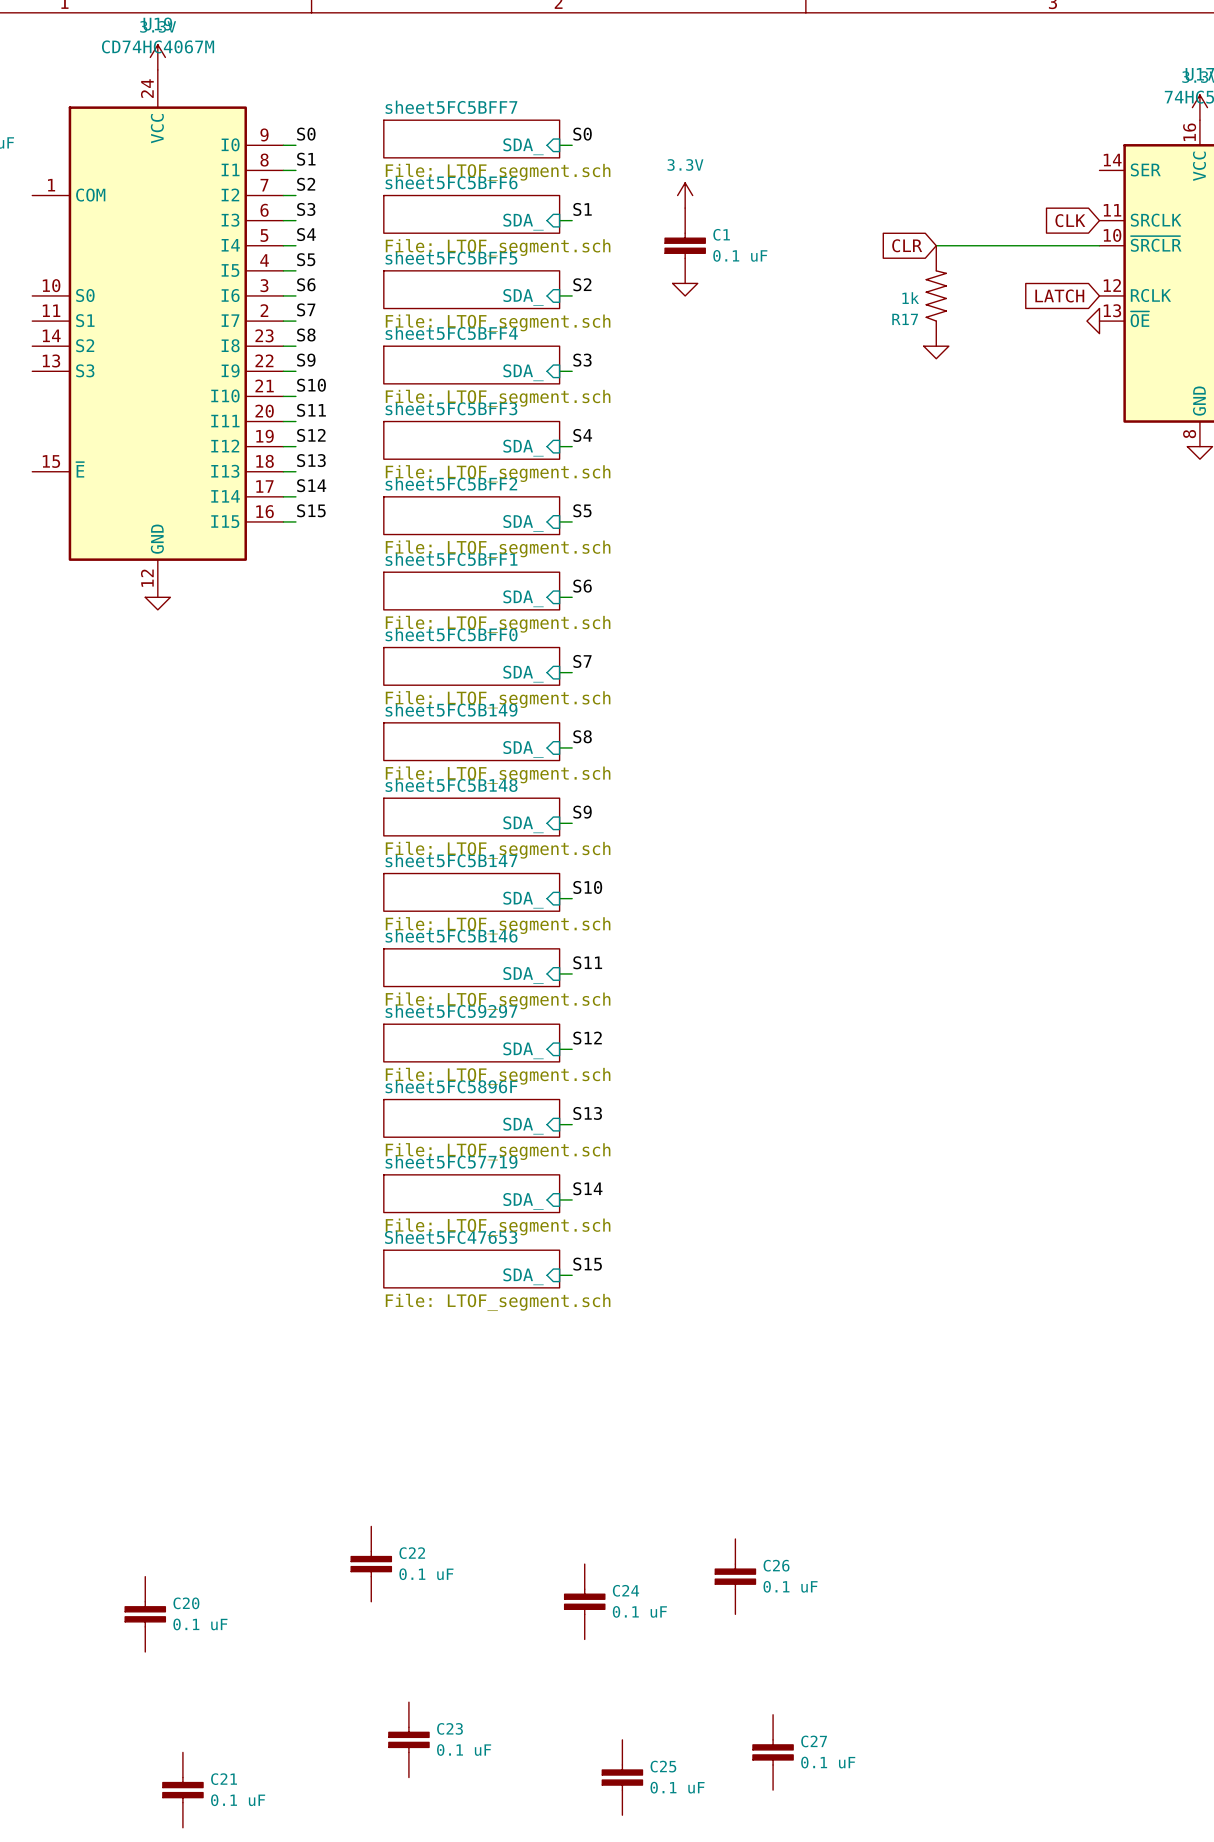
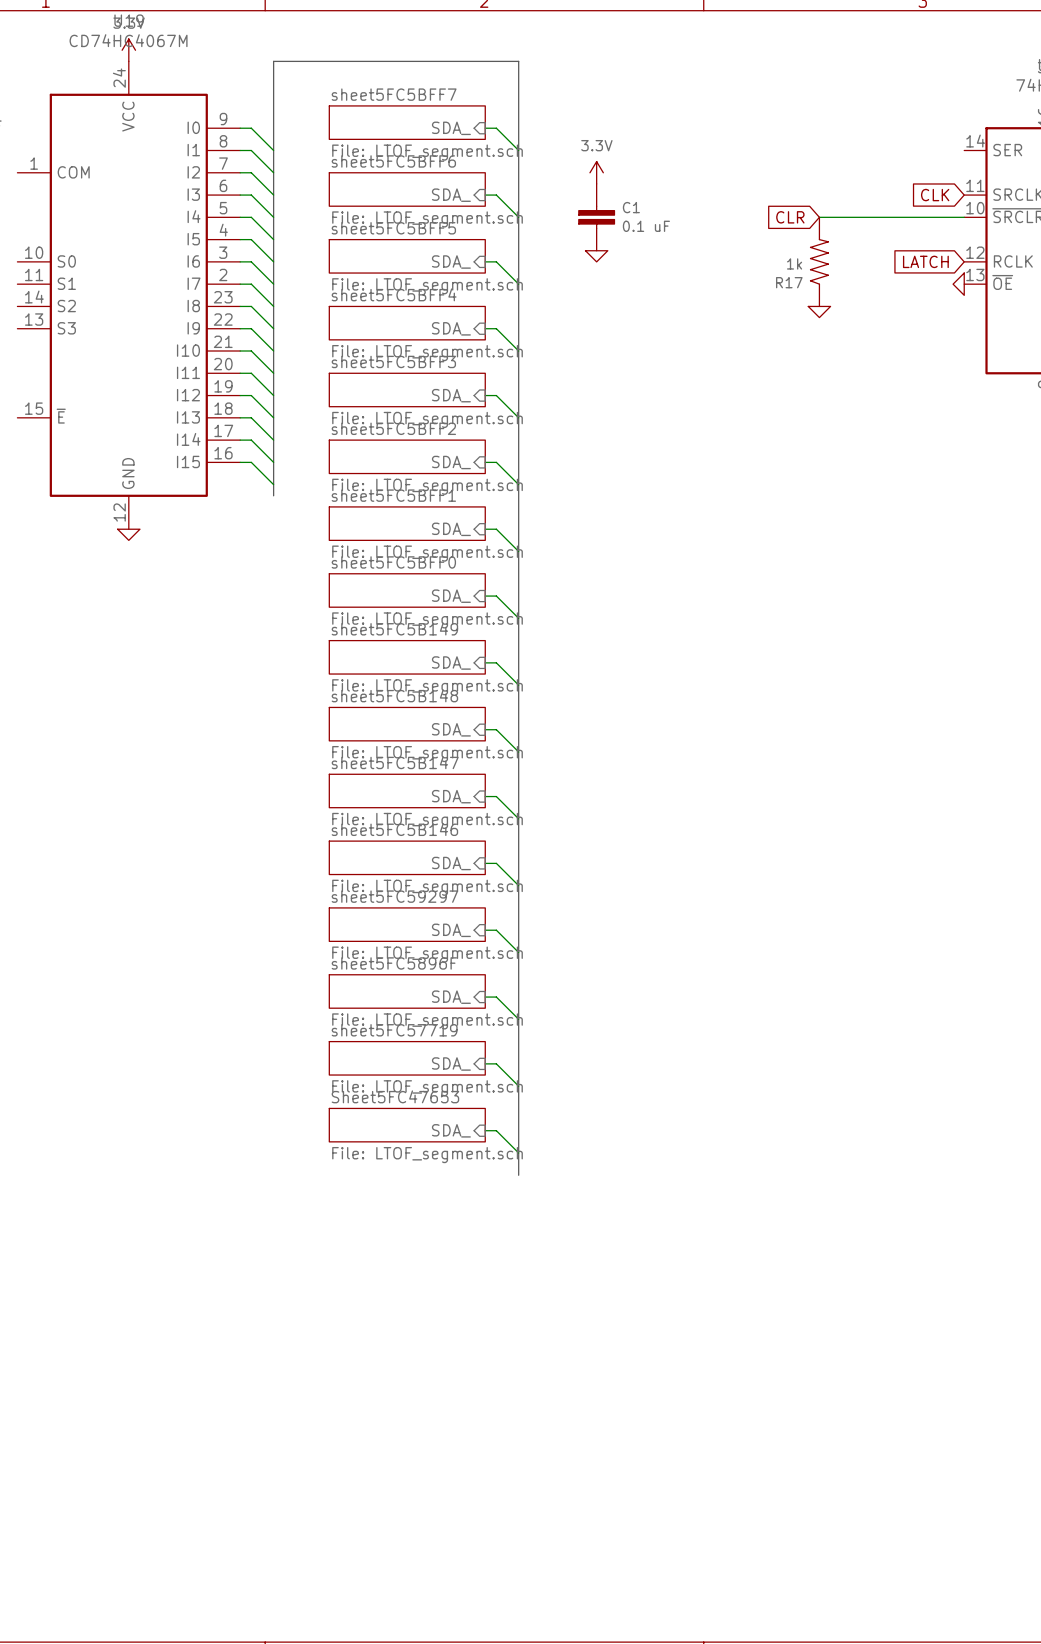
label: S0 (306, 134) -> none
label: S0 (582, 134) -> none
wire: none -> (251, 128) (273, 150)
wire: none -> (496, 128) (518, 150)
label: S1 (306, 159) -> none
wire: none -> (251, 150) (273, 172)
label: S2 (306, 184) -> none
wire: none -> (251, 172) (273, 195)
label: S3 (306, 209) -> none
label: S1 (582, 209) -> none
wire: none -> (251, 195) (273, 217)
wire: none -> (496, 195) (518, 217)
label: S4 (306, 234) -> none
wire: none -> (251, 217) (273, 239)
label: S5 (306, 259) -> none
wire: none -> (251, 239) (273, 261)
label: S6 (306, 284) -> none
label: S2 (582, 284) -> none
wire: none -> (251, 261) (273, 284)
wire: none -> (496, 261) (518, 284)
label: S7 (306, 309) -> none
wire: none -> (251, 284) (273, 306)
label: S8 (306, 335) -> none
wire: none -> (251, 306) (273, 328)
label: S9 (306, 360) -> none
label: S3 (582, 360) -> none
wire: none -> (251, 328) (273, 351)
wire: none -> (496, 328) (518, 351)
label: S10 (311, 385) -> none
wire: none -> (251, 351) (273, 373)
label: S11 (311, 410) -> none
wire: none -> (251, 373) (273, 395)
label: S12 (311, 435) -> none
label: S4 (582, 435) -> none
wire: none -> (251, 395) (273, 417)
wire: none -> (496, 395) (518, 417)
label: S13 (311, 460) -> none
wire: none -> (251, 417) (273, 440)
label: S14 (311, 485) -> none
wire: none -> (251, 440) (273, 462)
label: S15 (311, 510) -> none
label: S5 (582, 510) -> none
wire: none -> (251, 462) (273, 484)
wire: none -> (496, 462) (518, 484)
bus: none -> (273, 495) (273, 61) (518, 61) (518, 1175)
label: S6 (582, 586) -> none
wire: none -> (496, 529) (518, 551)
label: S7 (582, 661) -> none
wire: none -> (496, 596) (518, 618)
label: S8 (582, 736) -> none
wire: none -> (496, 662) (518, 685)
label: S9 (582, 812) -> none
wire: none -> (496, 729) (518, 751)
label: S10 (587, 887) -> none
wire: none -> (496, 796) (518, 818)
label: S11 (587, 962) -> none
wire: none -> (496, 863) (518, 885)
label: S12 (587, 1038) -> none
wire: none -> (496, 930) (518, 952)
label: S13 (587, 1113) -> none
wire: none -> (496, 997) (518, 1019)
label: S14 (587, 1188) -> none
wire: none -> (496, 1063) (518, 1086)
label: S15 (587, 1264) -> none
wire: none -> (496, 1130) (518, 1152)
C22: 0.1 uF (371, 1564) -> none
C26: 0.1 uF (735, 1576) -> none
C24: 0.1 uF (584, 1601) -> none
C20: 0.1 uF (145, 1614) -> none
C23: 0.1 uF (408, 1739) -> none
C27: 0.1 uF (773, 1752) -> none
C25: 0.1 uF (622, 1777) -> none
C21: 0.1 uF (182, 1790) -> none

